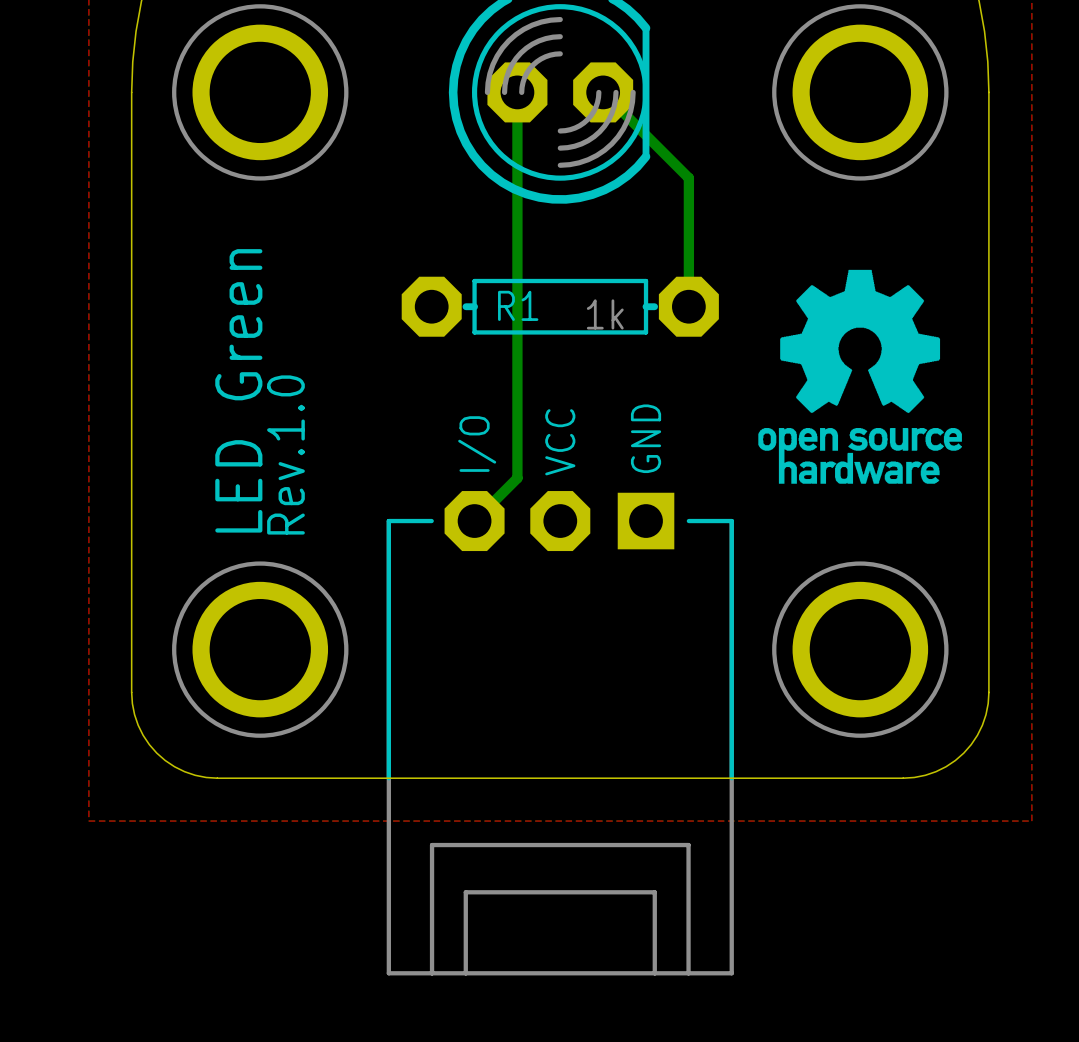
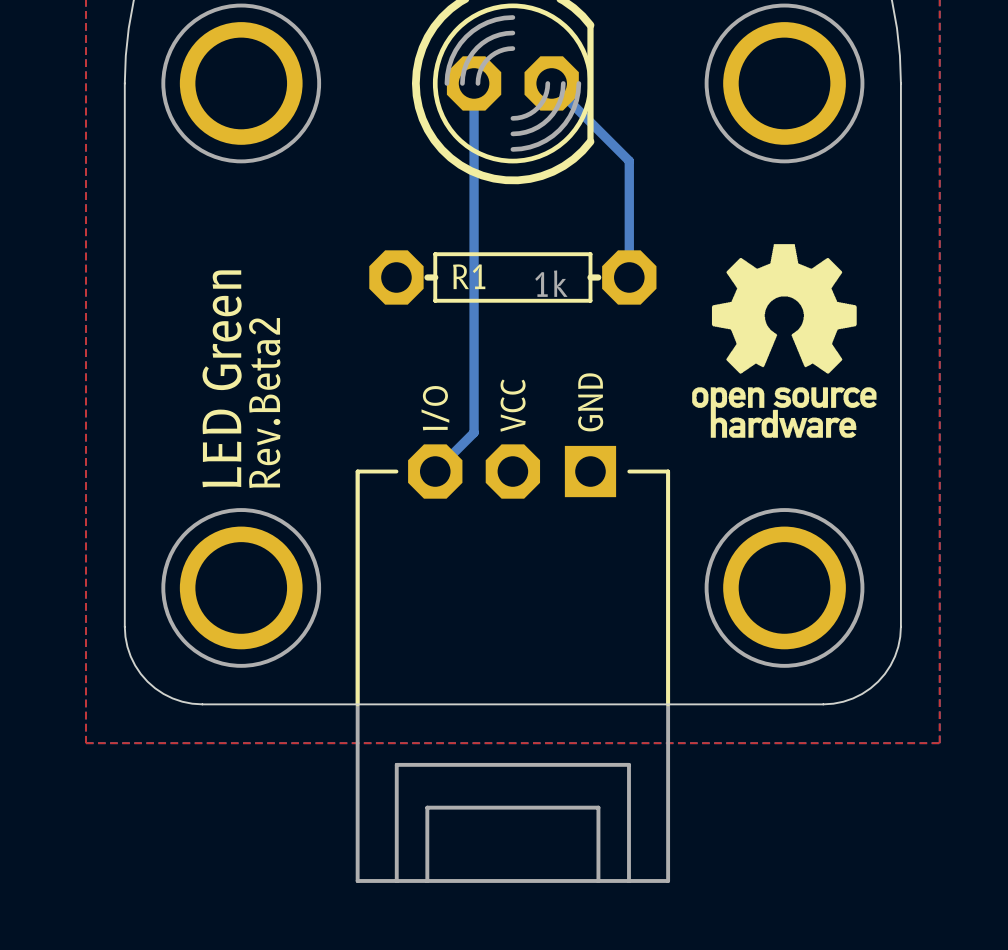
text: Rev.1.0 (285, 454) -> Rev.Beta2 (264, 403)

